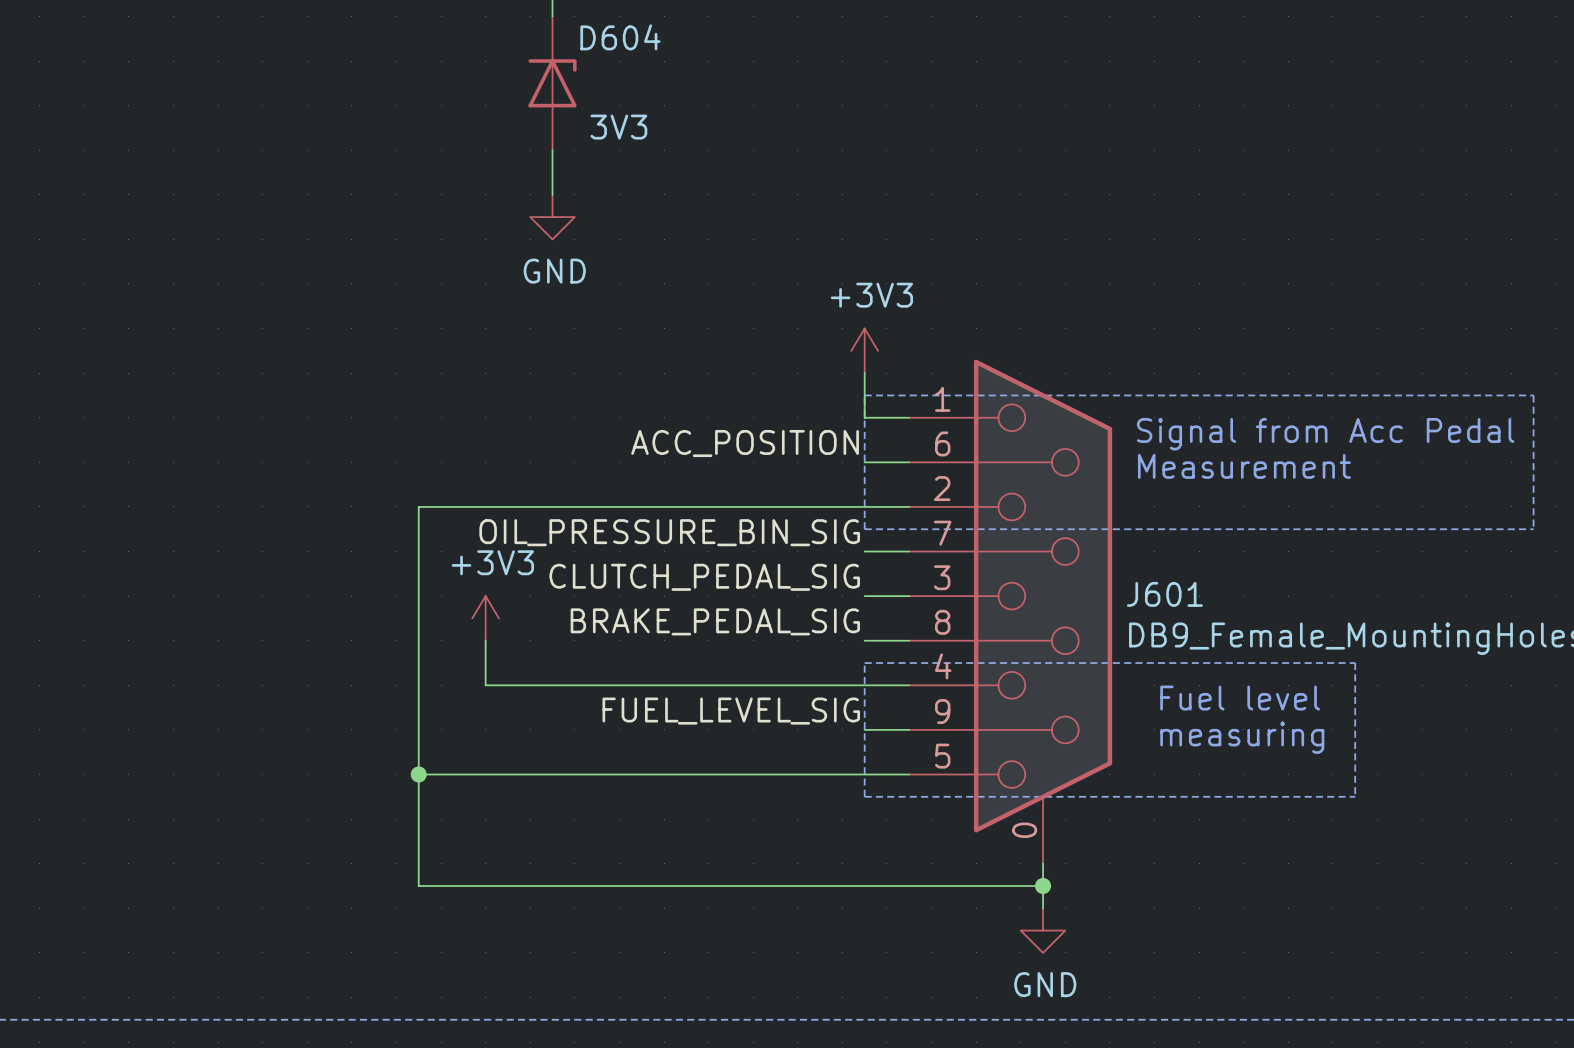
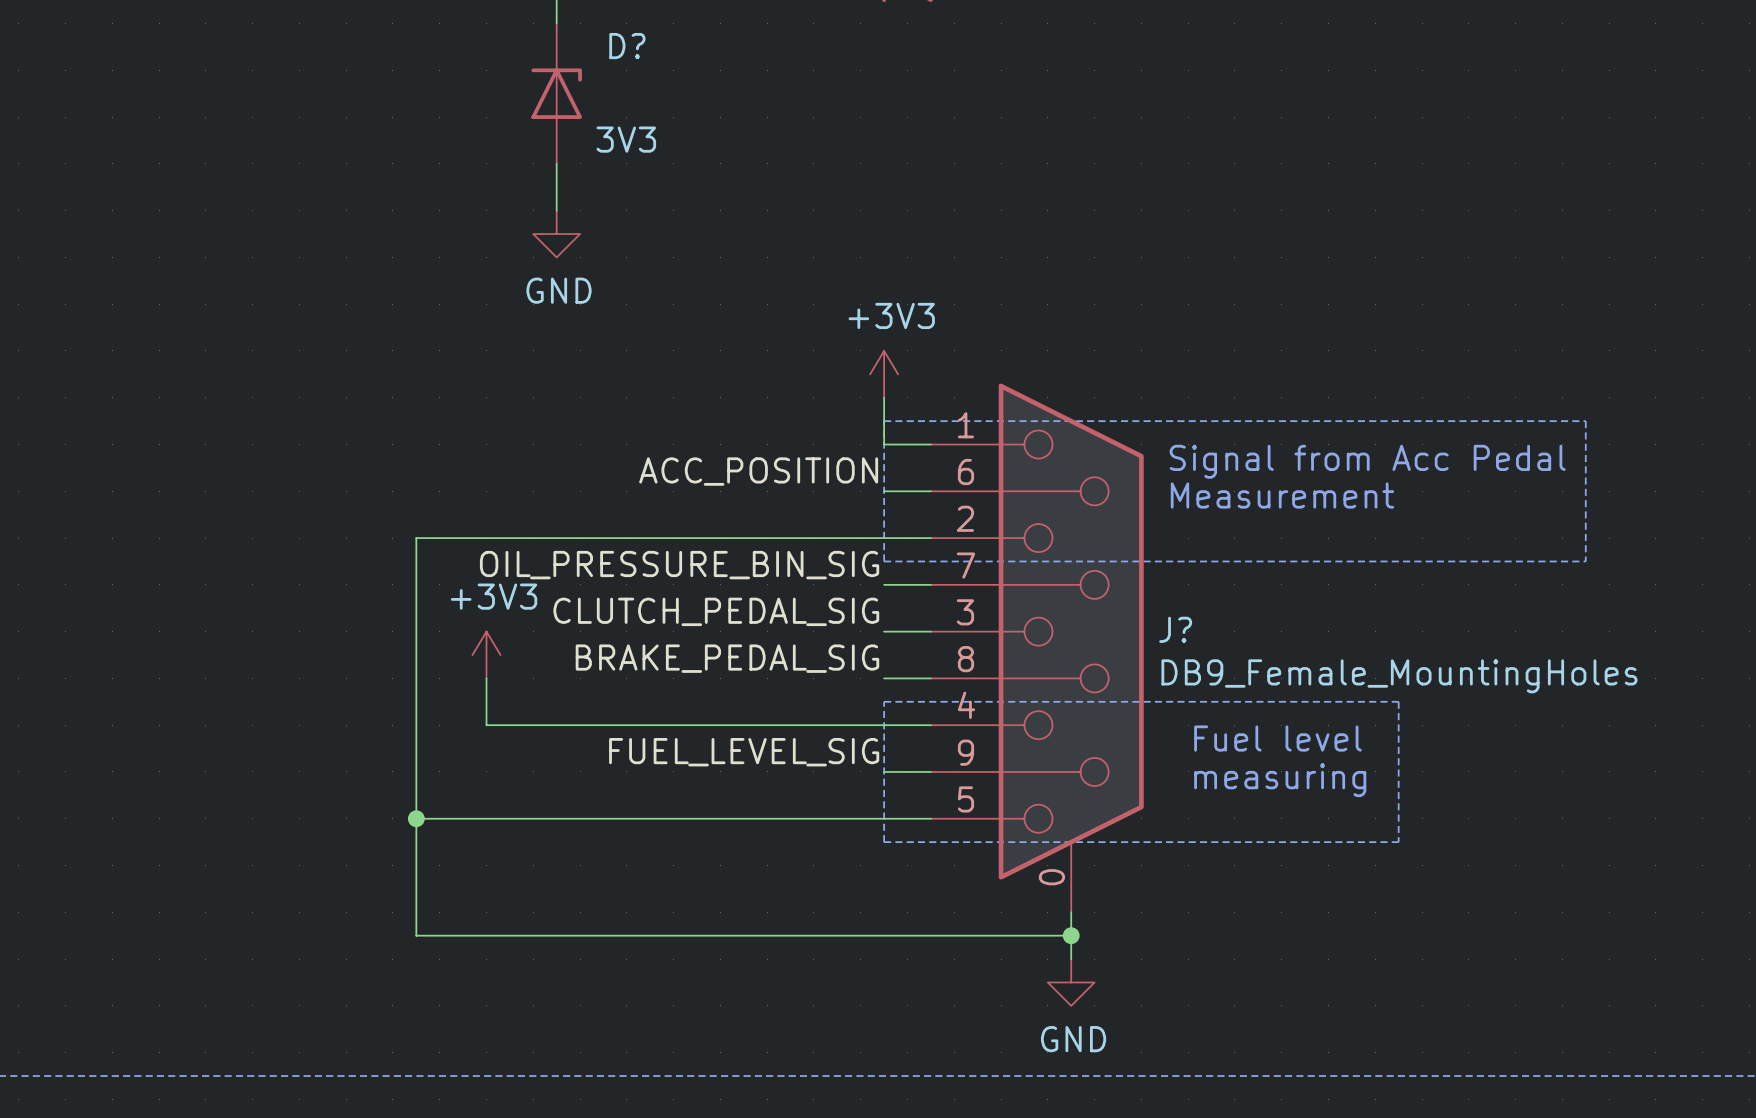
D604 name: D604 (620, 37) -> D? (627, 46)
J601 name: J601 (1164, 594) -> J? (1175, 629)

